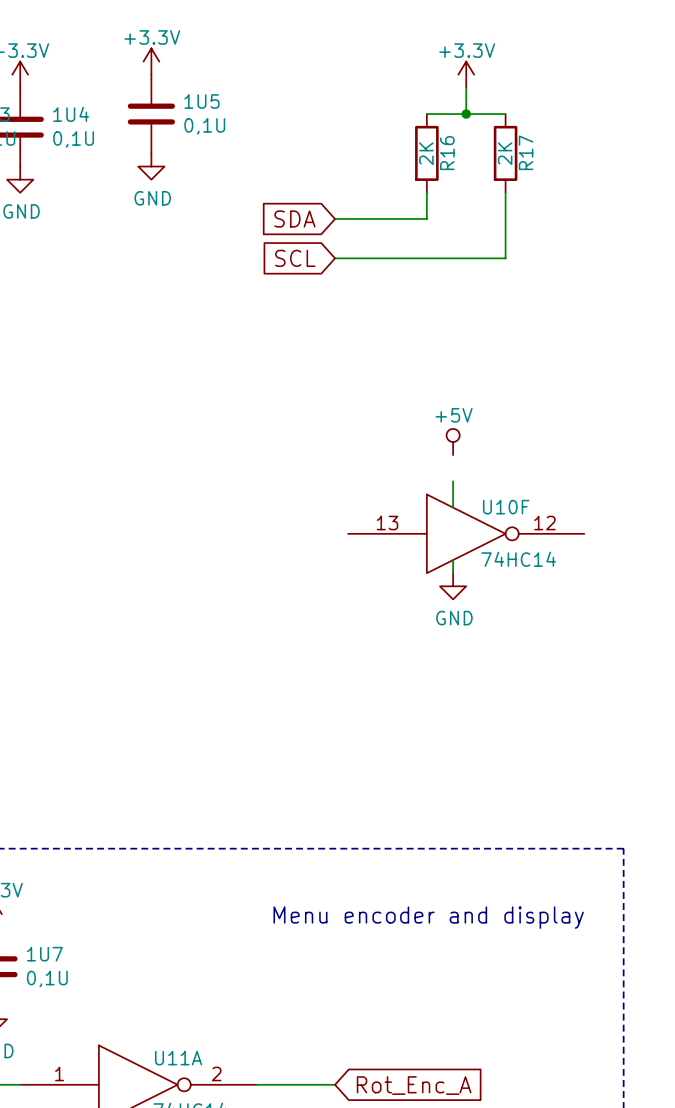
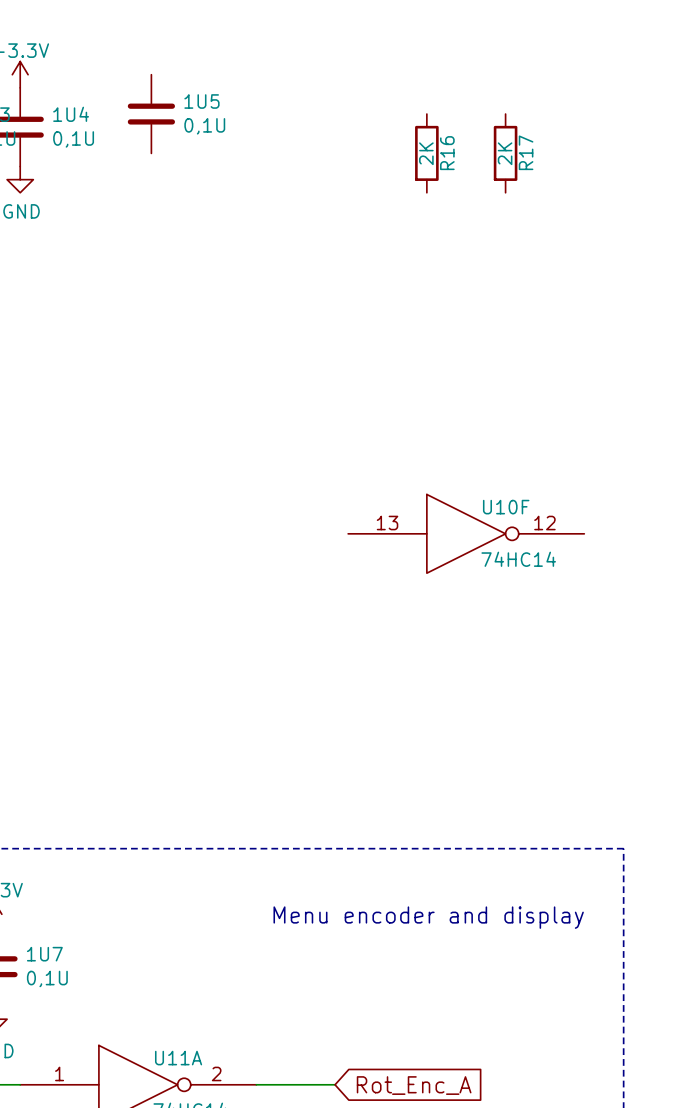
power symbol: +3.3V (151, 61) -> none
power symbol: +3.3V (466, 74) -> none
wire: (466, 87) (466, 114) -> none
wire: (426, 114) (505, 114) -> none
junction: (466, 114) -> none
power symbol: GND (151, 166) -> none
wire: (426, 192) (426, 219) (335, 219) -> none
wire: (505, 192) (505, 258) (335, 258) -> none
global label: SDA (294, 219) -> none
global label: SCL (295, 258) -> none
power symbol: +5V (453, 442) -> none
wire: (453, 481) (453, 507) -> none
wire: (453, 560) (453, 573) -> none
power symbol: GND (453, 586) -> none

